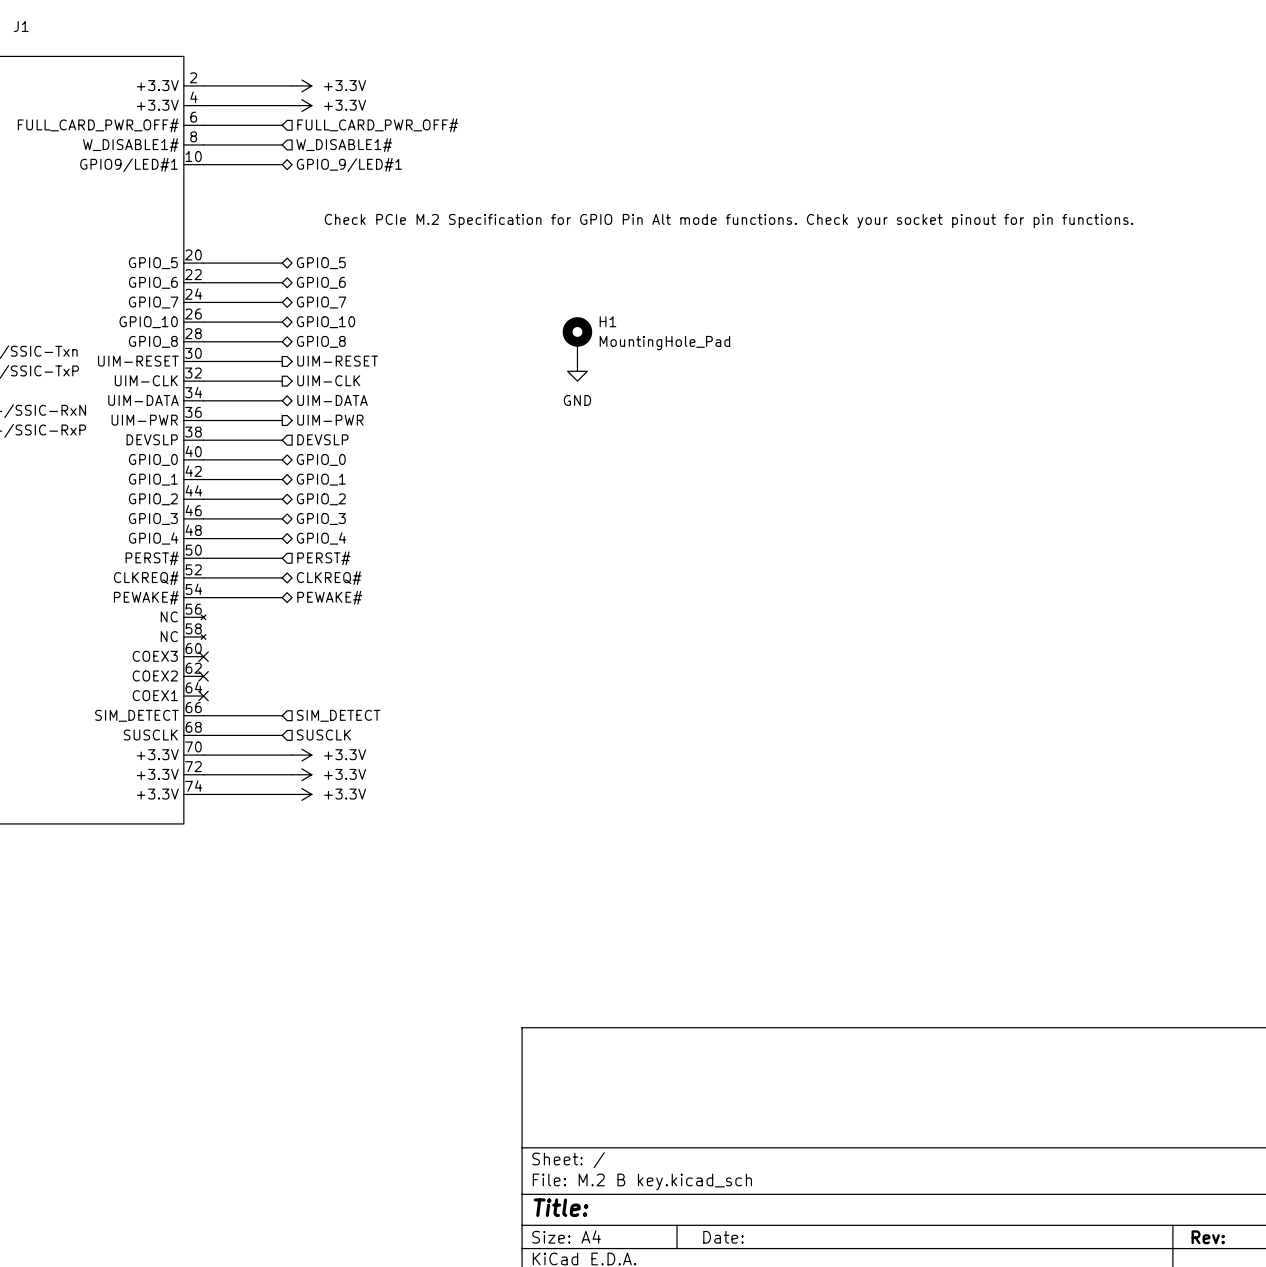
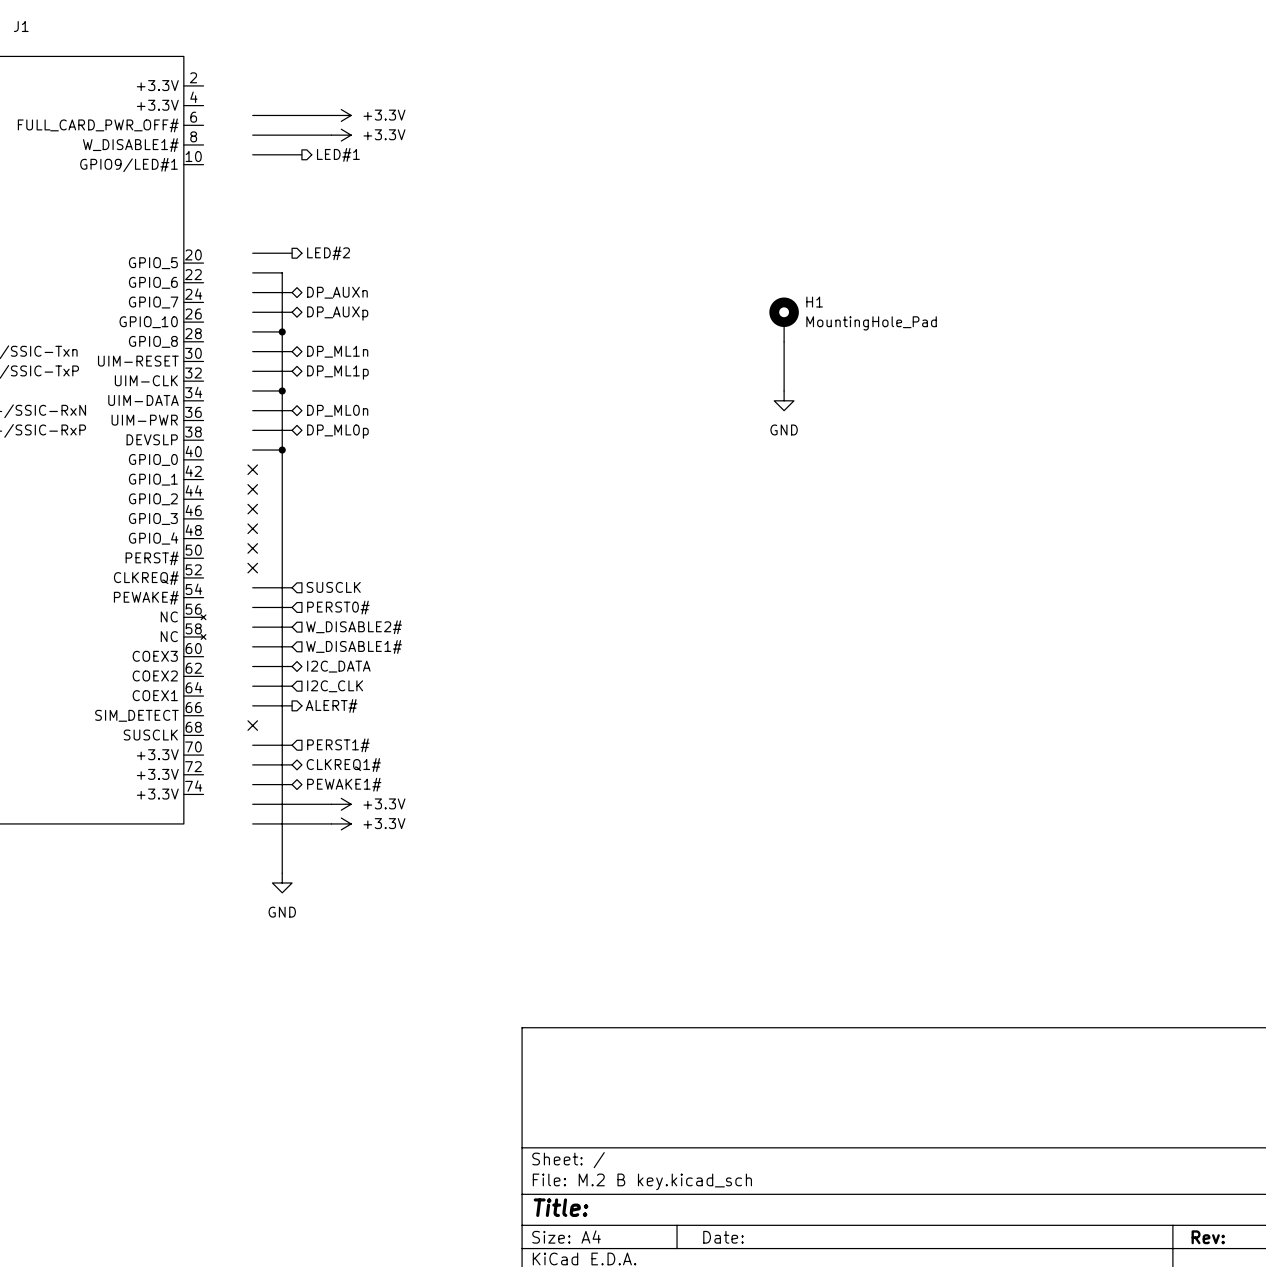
wire: (203, 85) (292, 85) -> none
power symbol: +3.3V (301, 85) -> none
wire: (203, 105) (292, 105) -> none
power symbol: +3.3V (301, 105) -> none
power symbol: none -> +3.3V (341, 115)
wire: (203, 125) (282, 125) -> (252, 115) (331, 115)
hierarchical label: FULL_CARD_PWR_OFF# (377, 125) -> none
power symbol: none -> +3.3V (341, 135)
wire: (203, 144) (282, 144) -> (252, 135) (331, 135)
hierarchical label: W_DISABLE1# (344, 145) -> none
wire: none -> (252, 154) (301, 154)
hierarchical label: none -> LED#1 (338, 154)
wire: (203, 164) (282, 164) -> none
hierarchical label: GPIO_9/LED#1 (349, 164) -> none
text: Check PCIe M.2 Specification for GPIO Pin Alt mode functions. Check your socket pinout for pin functions. (728, 221) -> none
wire: none -> (252, 253) (292, 253)
hierarchical label: none -> LED#2 (328, 253)
wire: (203, 263) (282, 263) -> none
hierarchical label: GPIO_5 (321, 263) -> none
wire: none -> (252, 272) (282, 272) (282, 873)
wire: (203, 282) (282, 282) -> none
hierarchical label: GPIO_6 (321, 282) -> none
wire: none -> (252, 292) (292, 292)
hierarchical label: none -> DP_AUXn (337, 292)
wire: (203, 302) (282, 302) -> none
hierarchical label: GPIO_7 (321, 302) -> none
wire: none -> (252, 312) (292, 312)
hierarchical label: none -> DP_AUXp (337, 313)
wire: (203, 322) (282, 322) -> none
hierarchical label: GPIO_10 (325, 322) -> none
wire: none -> (252, 331) (282, 331)
junction: none -> (282, 331)
H1 position: (577, 339) -> (784, 319)
wire: (203, 341) (282, 341) -> none
hierarchical label: GPIO_8 (321, 341) -> none
wire: none -> (784, 341) (784, 390)
wire: none -> (252, 351) (292, 351)
hierarchical label: none -> DP_ML1n (337, 351)
wire: (203, 361) (282, 361) -> none
hierarchical label: UIM-RESET (337, 361) -> none
wire: none -> (252, 371) (292, 371)
power symbol: GND (577, 371) -> none
hierarchical label: none -> DP_ML1p (337, 372)
hierarchical label: UIM-CLK (328, 380) -> none
wire: (203, 381) (282, 381) -> none
wire: none -> (252, 390) (282, 390)
junction: none -> (282, 390)
wire: (203, 400) (282, 400) -> none
hierarchical label: UIM-DATA (332, 400) -> none
power symbol: none -> GND (784, 400)
wire: none -> (252, 410) (292, 410)
hierarchical label: none -> DP_ML0n (337, 410)
wire: (203, 420) (282, 420) -> none
hierarchical label: UIM-PWR (330, 420) -> none
wire: none -> (252, 430) (292, 430)
hierarchical label: none -> DP_ML0p (337, 431)
hierarchical label: DEVSLP (322, 439) -> none
wire: (203, 440) (282, 440) -> none
wire: none -> (252, 450) (282, 450)
junction: none -> (282, 450)
wire: (203, 459) (282, 459) -> none
hierarchical label: GPIO_0 (321, 459) -> none
no-connect mark: none -> (252, 469)
wire: (203, 479) (282, 479) -> none
hierarchical label: GPIO_1 (321, 479) -> none
no-connect mark: none -> (252, 489)
wire: (203, 499) (282, 499) -> none
hierarchical label: GPIO_2 (321, 499) -> none
no-connect mark: none -> (252, 509)
wire: (203, 518) (282, 518) -> none
hierarchical label: GPIO_3 (321, 519) -> none
no-connect mark: none -> (252, 528)
wire: (203, 538) (282, 538) -> none
hierarchical label: GPIO_4 (321, 538) -> none
no-connect mark: none -> (252, 548)
wire: (203, 558) (282, 558) -> none
hierarchical label: PERST# (323, 558) -> none
no-connect mark: none -> (252, 568)
wire: (203, 577) (282, 577) -> none
hierarchical label: CLKREQ# (329, 578) -> none
wire: none -> (252, 587) (292, 587)
wire: (203, 597) (282, 597) -> none
hierarchical label: PEWAKE# (329, 597) -> none
wire: none -> (252, 607) (292, 607)
hierarchical label: none -> PERST0# (338, 607)
wire: none -> (252, 627) (292, 627)
hierarchical label: none -> W_DISABLE2# (354, 627)
wire: none -> (252, 646) (292, 646)
hierarchical label: none -> W_DISABLE1# (354, 646)
no-connect mark: (203, 656) -> none
wire: none -> (252, 666) (292, 666)
hierarchical label: none -> I2C_DATA (338, 666)
no-connect mark: (203, 676) -> none
wire: none -> (252, 686) (292, 686)
hierarchical label: none -> I2C_CLK (335, 686)
no-connect mark: (203, 696) -> none
wire: none -> (252, 705) (292, 705)
hierarchical label: none -> ALERT# (331, 705)
wire: (203, 715) (282, 715) -> (252, 804) (331, 804)
hierarchical label: SIM_DETECT (338, 715) -> none
no-connect mark: none -> (252, 725)
wire: (203, 735) (282, 735) -> (252, 823) (331, 823)
hierarchical label position: SUSCLK (323, 735) -> SUSCLK (333, 587)
wire: none -> (252, 745) (292, 745)
hierarchical label: none -> PERST1# (338, 745)
wire: (203, 755) (292, 755) -> none
power symbol: +3.3V (301, 755) -> none
wire: none -> (252, 764) (292, 764)
hierarchical label: none -> CLKREQ1# (343, 765)
wire: (203, 774) (292, 774) -> none
power symbol: +3.3V (301, 774) -> none
wire: none -> (252, 784) (292, 784)
hierarchical label: none -> PEWAKE1# (344, 784)
wire: (203, 794) (292, 794) -> none
power symbol: +3.3V (301, 794) -> none
power symbol: none -> +3.3V (341, 804)
power symbol: none -> +3.3V (341, 823)
power symbol: none -> GND (282, 883)

